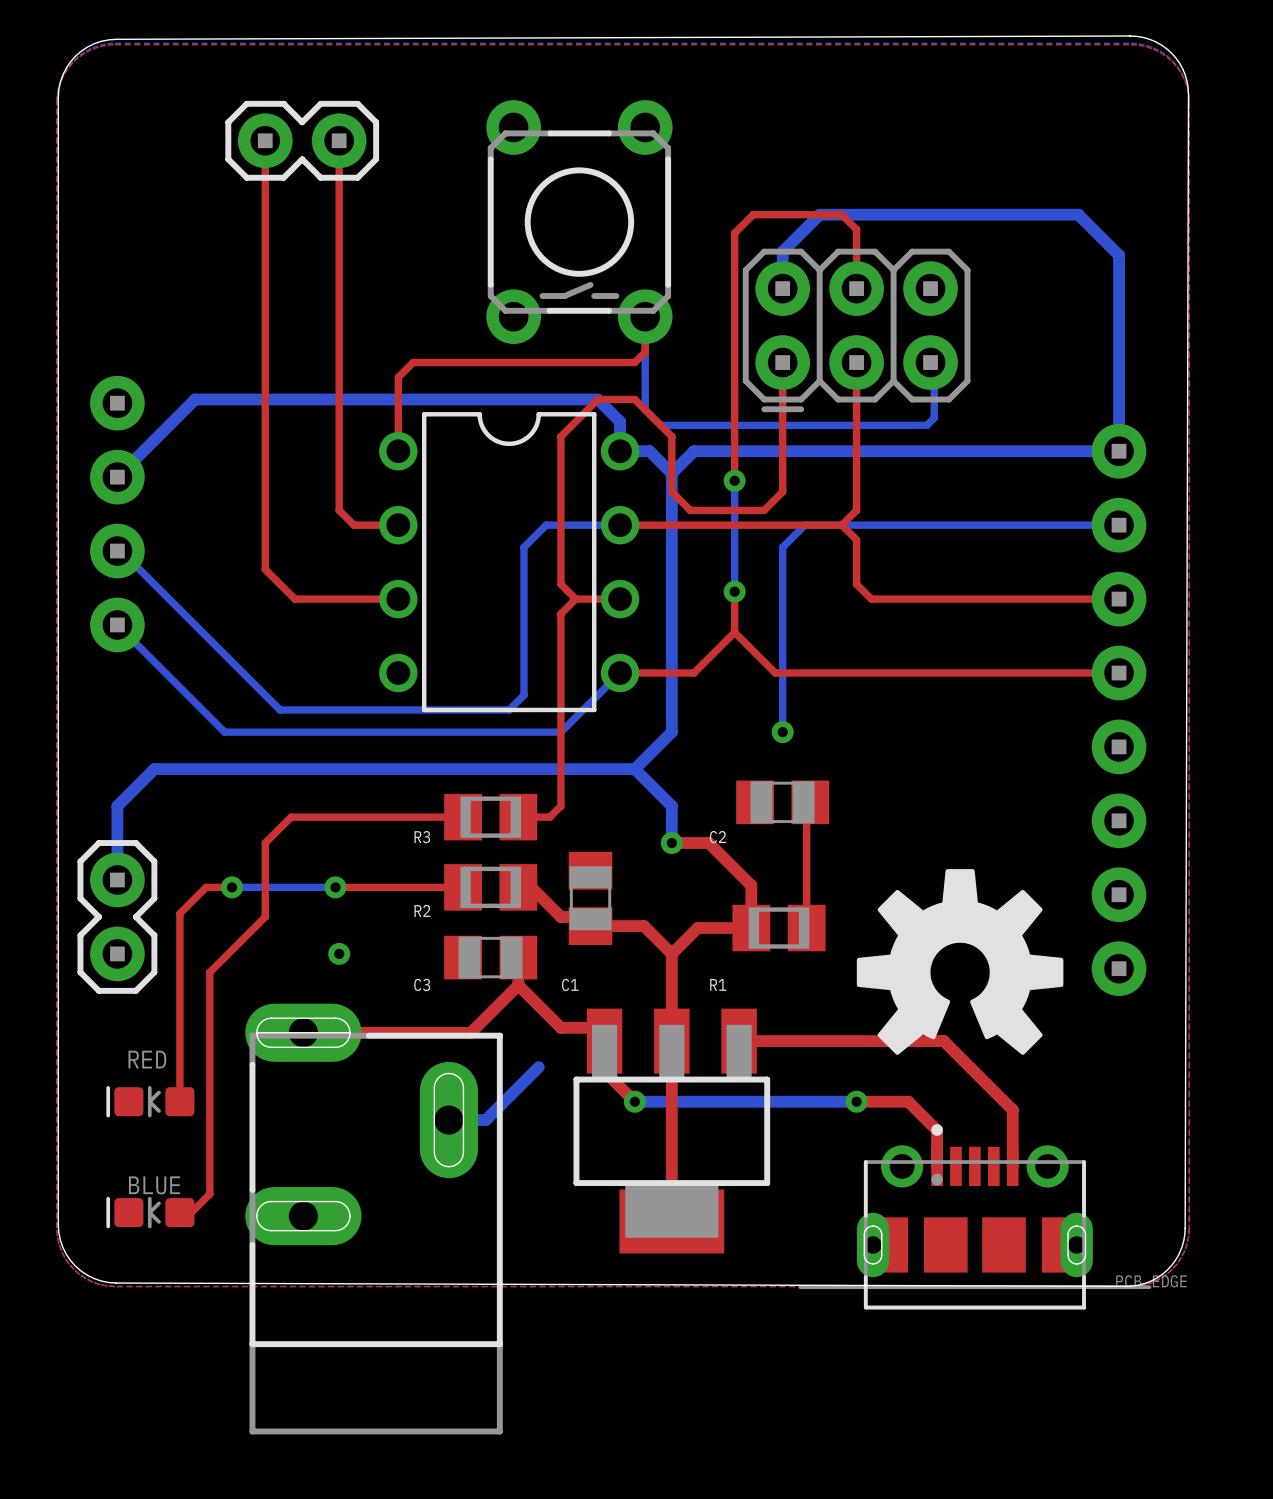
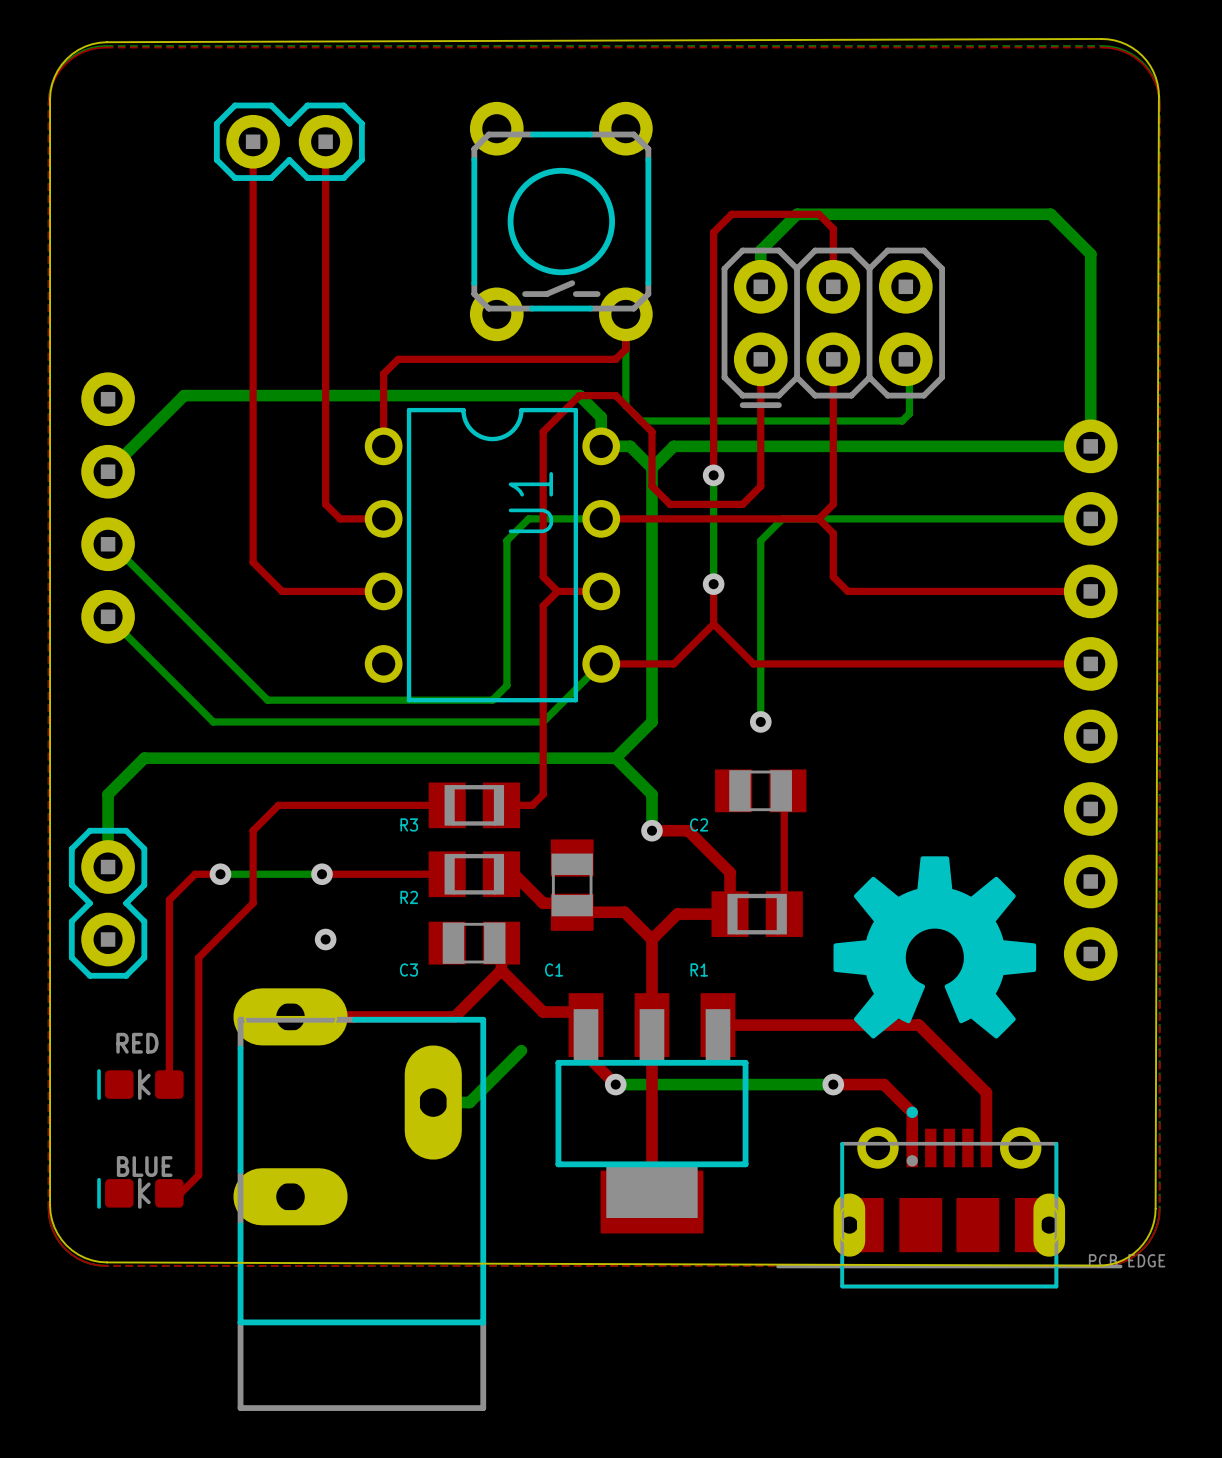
U1 name: none -> U1 (530, 502)

